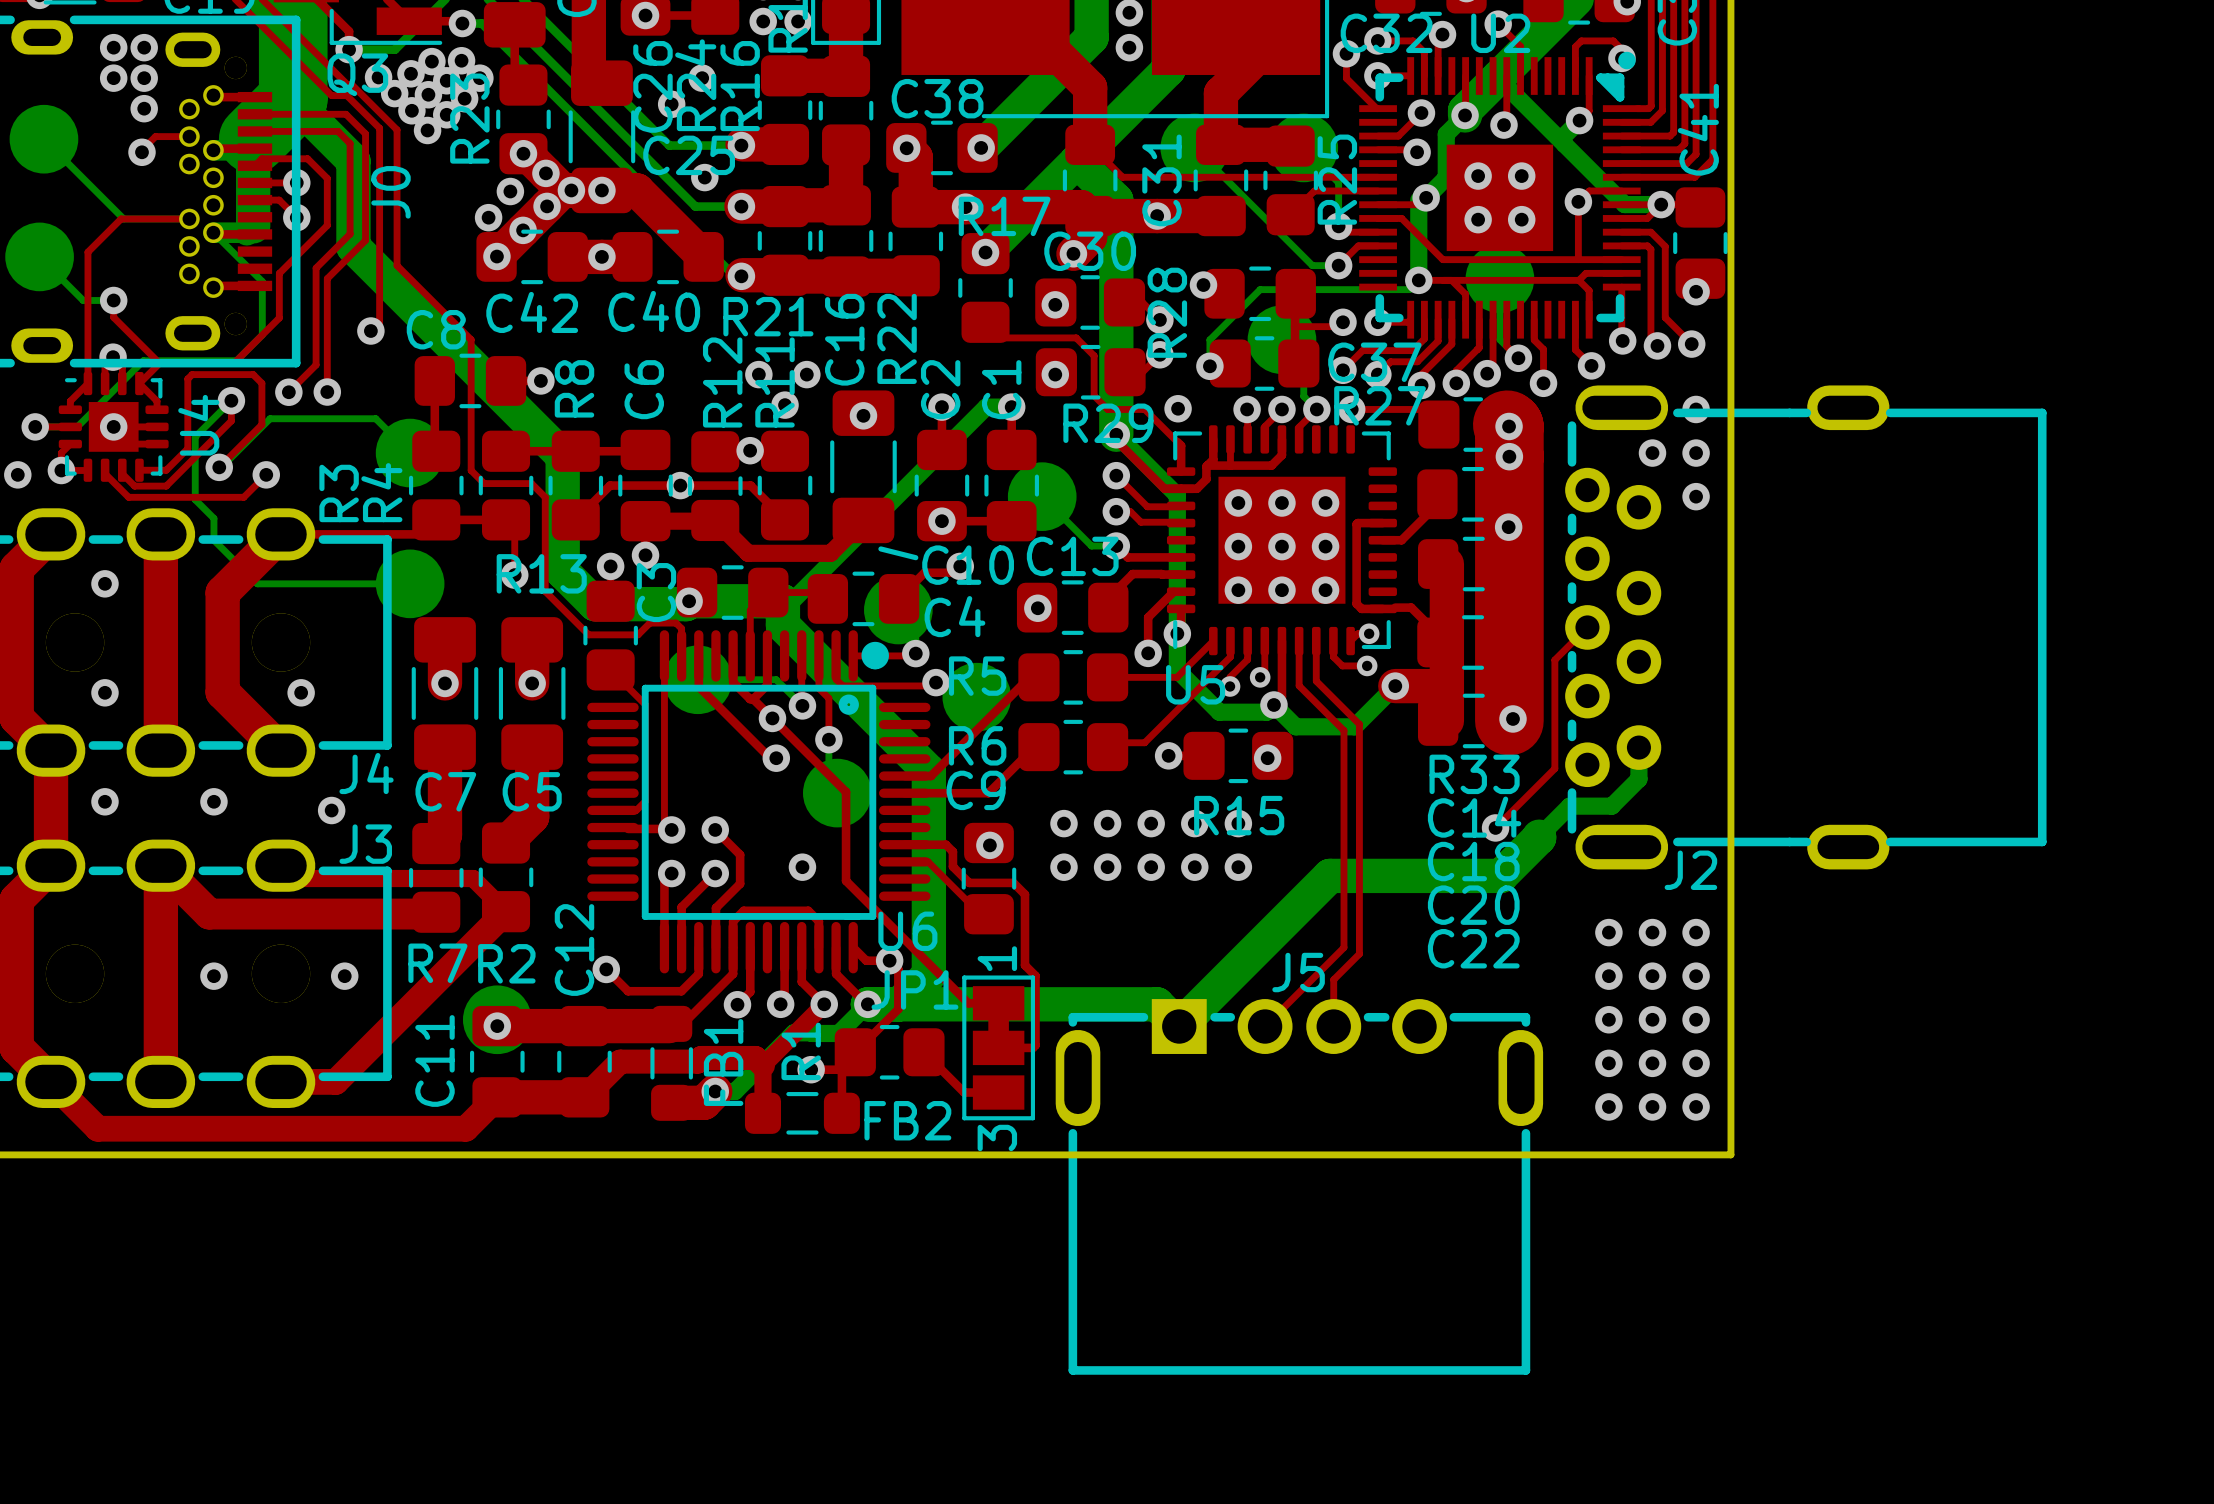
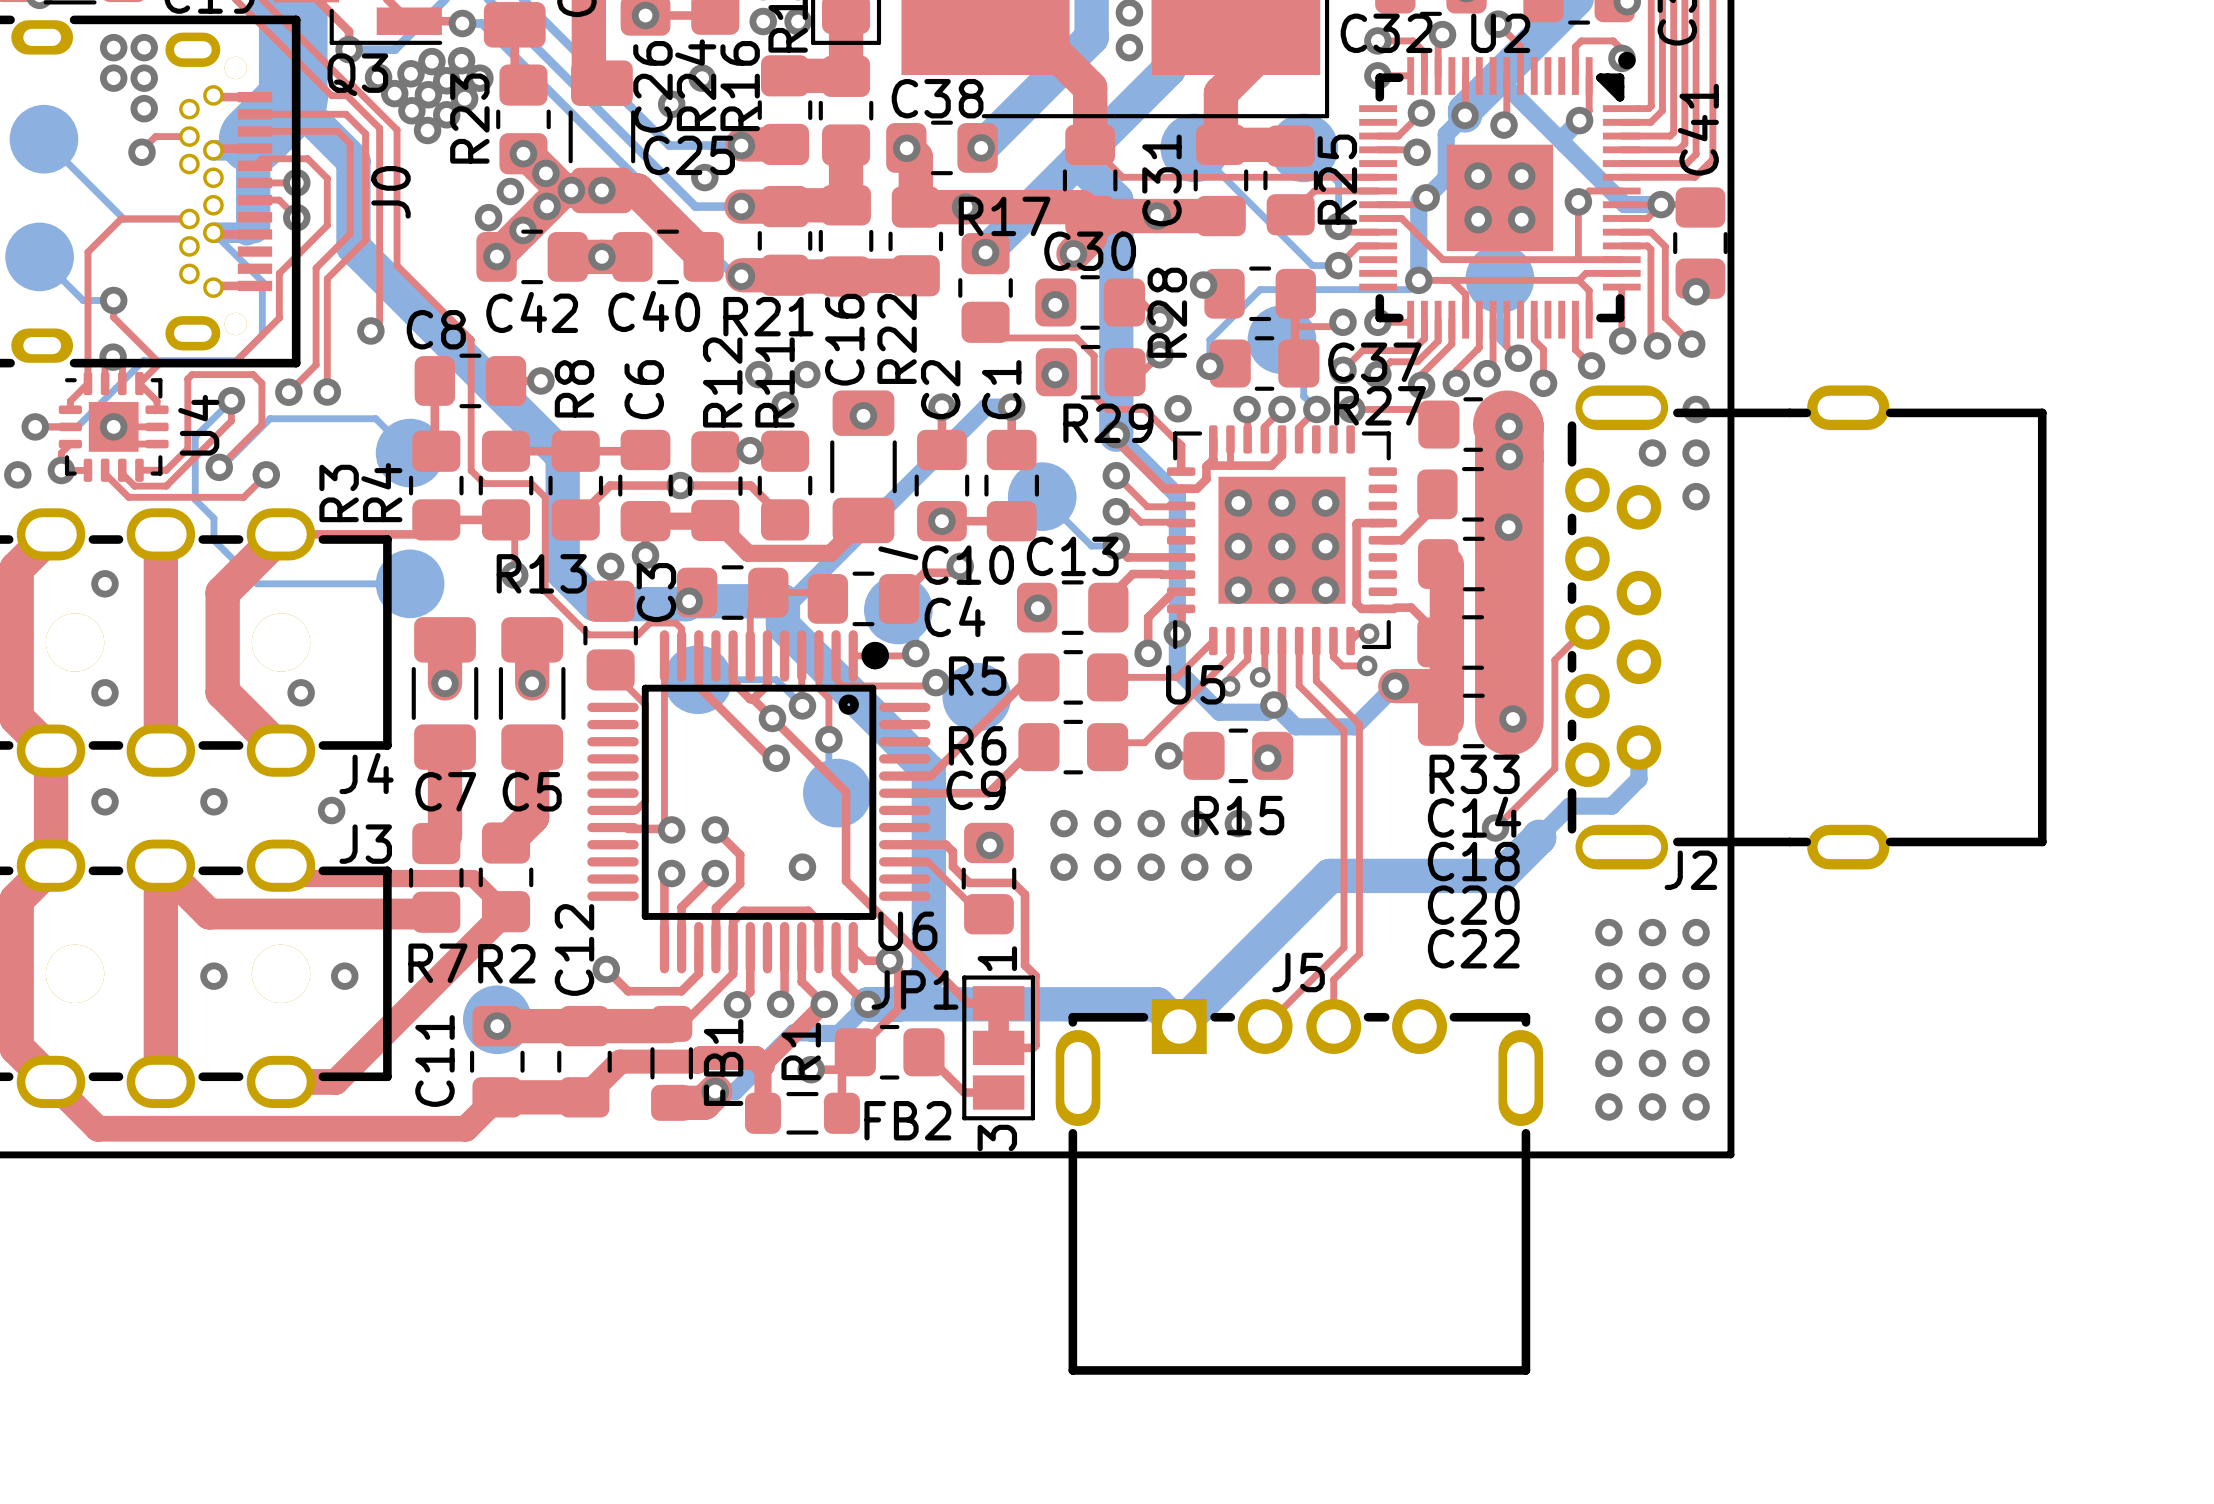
top track: (1346, 53) (1346, 78) (1378, 108) -> none
via: (1346, 53) -> none

